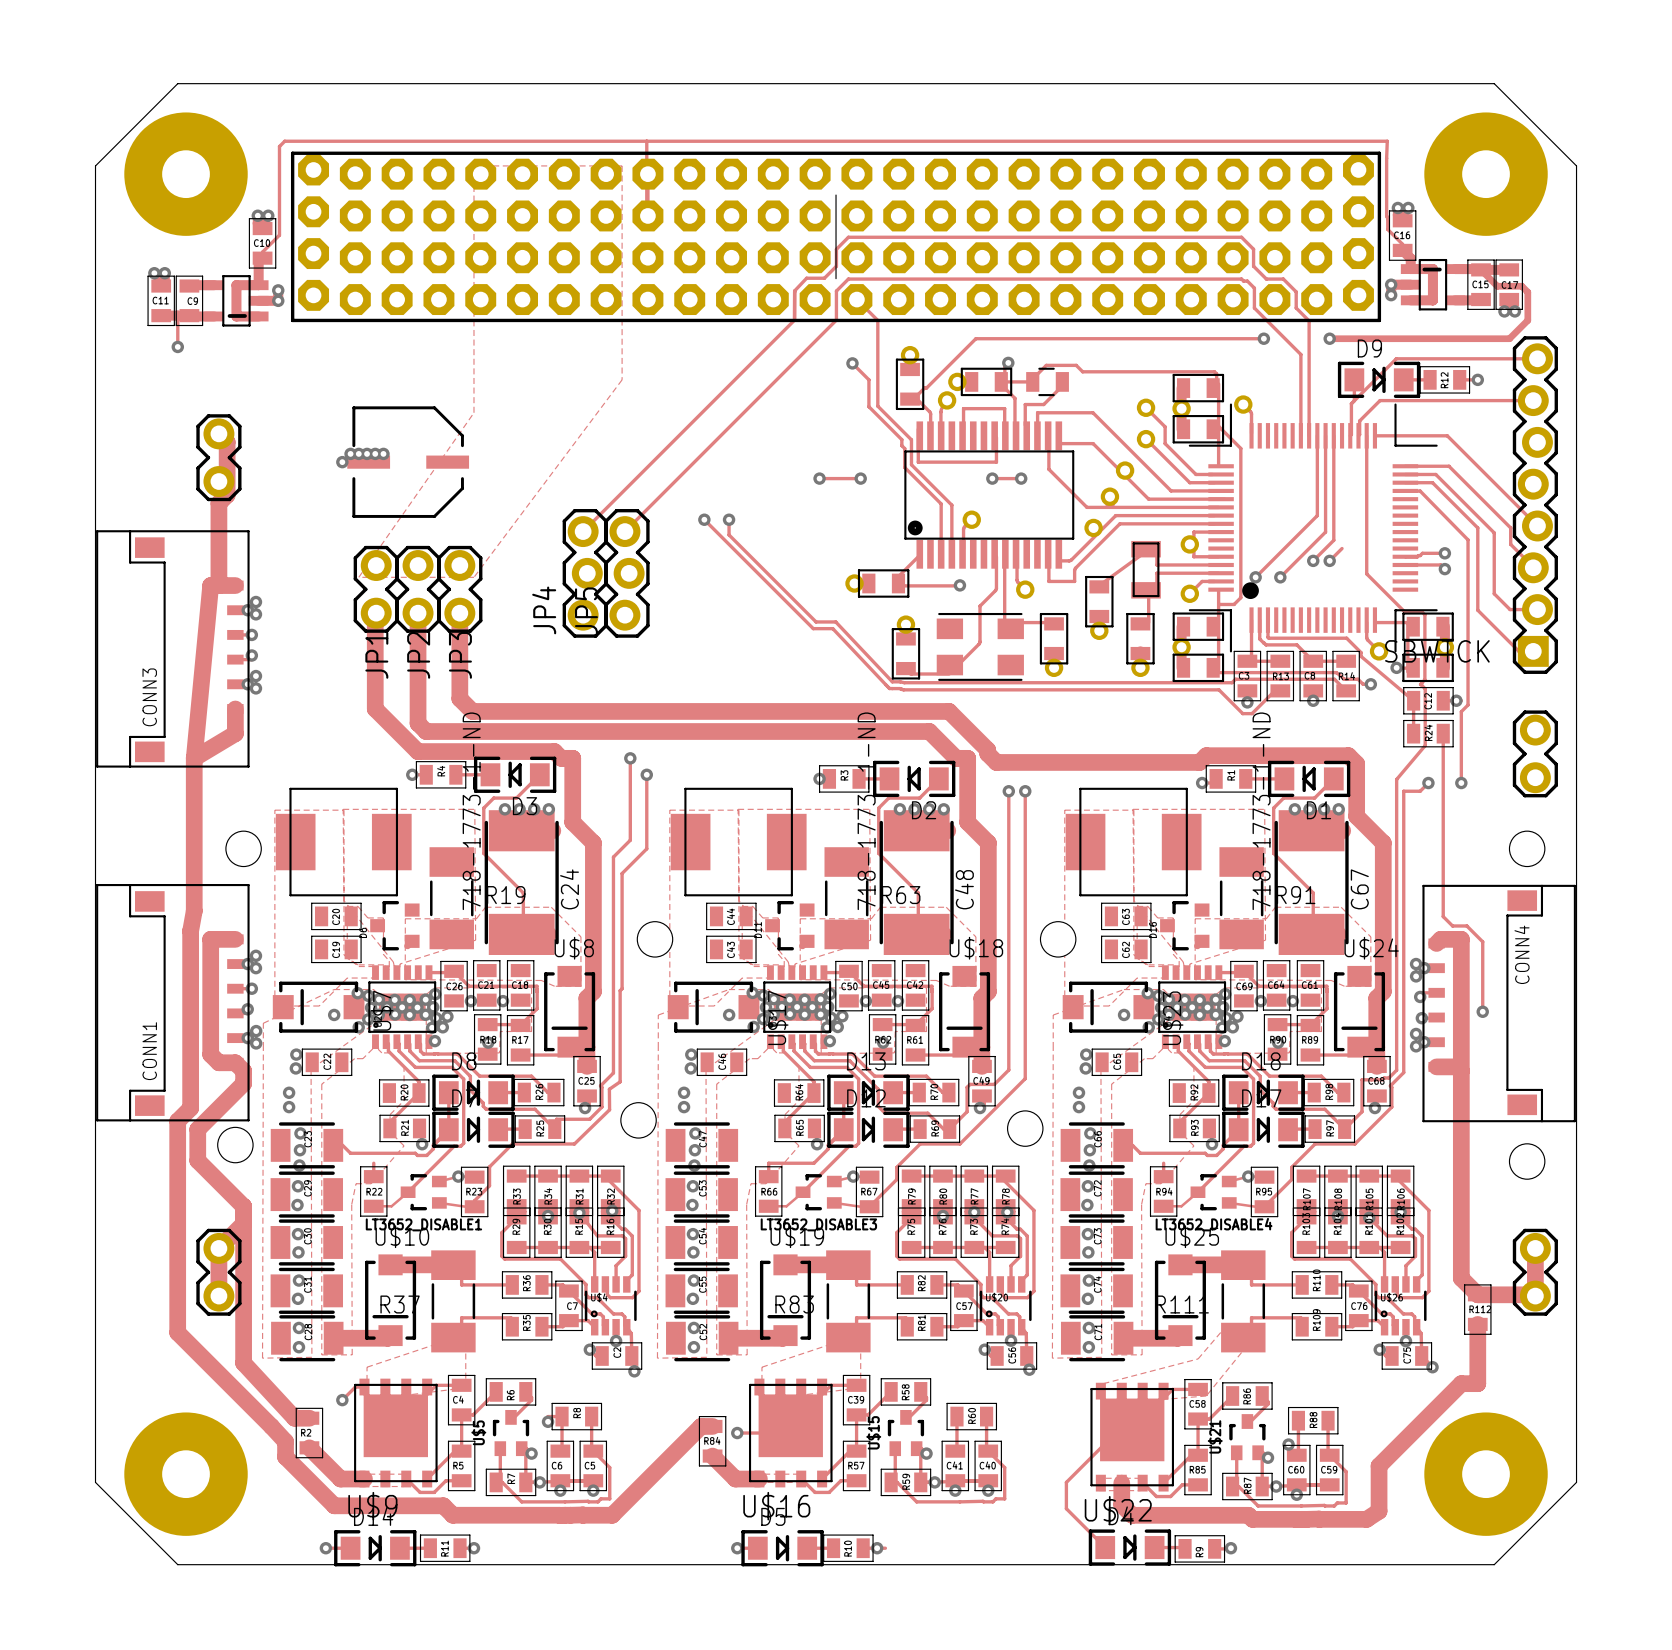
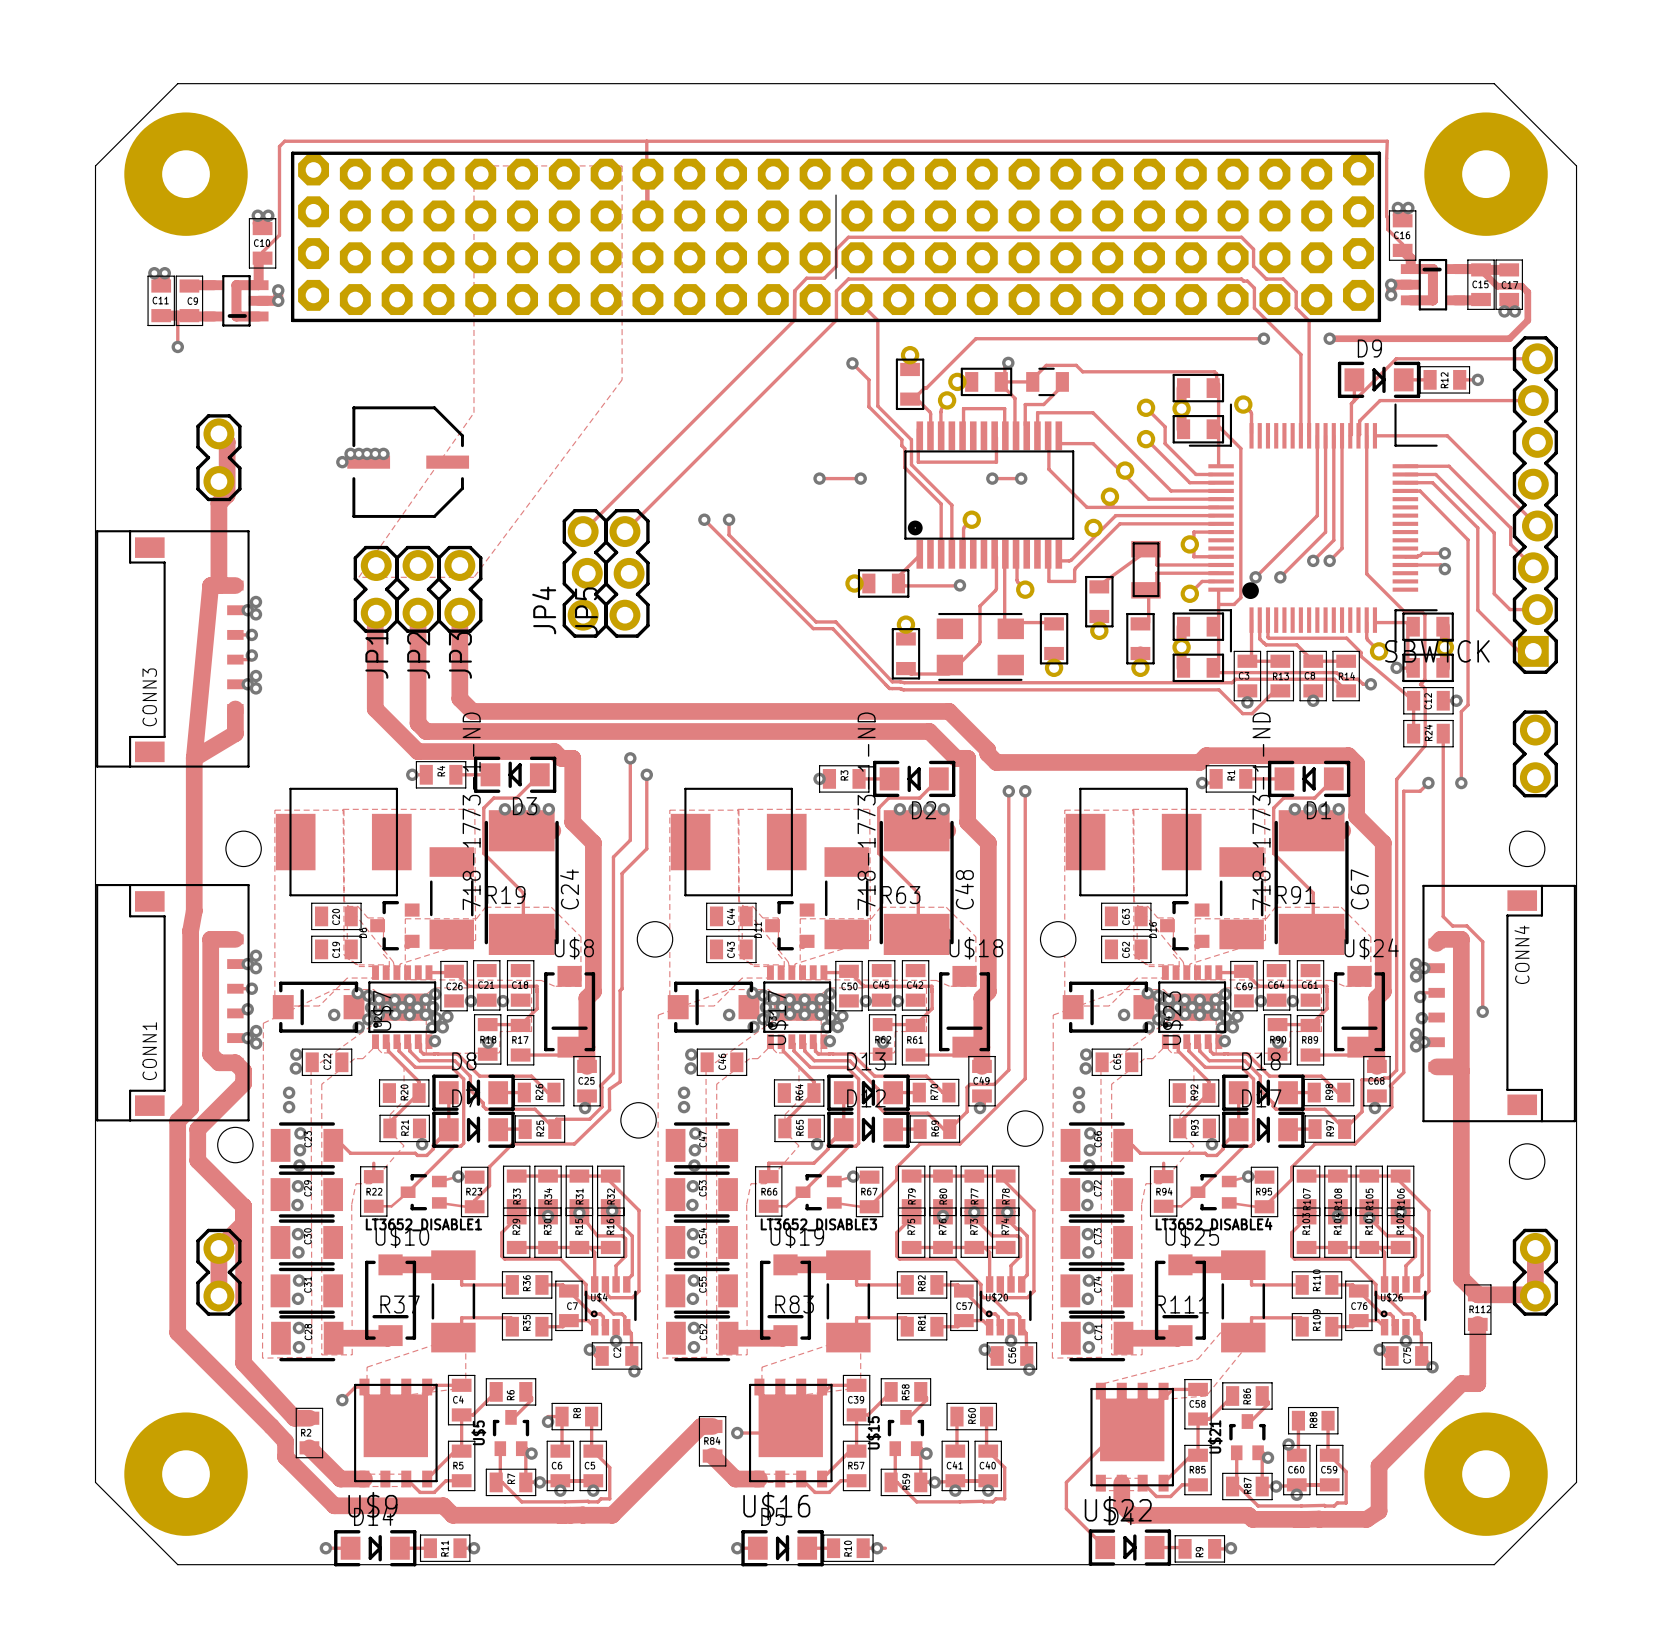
track: none -> (1342, 435) (1342, 548)

